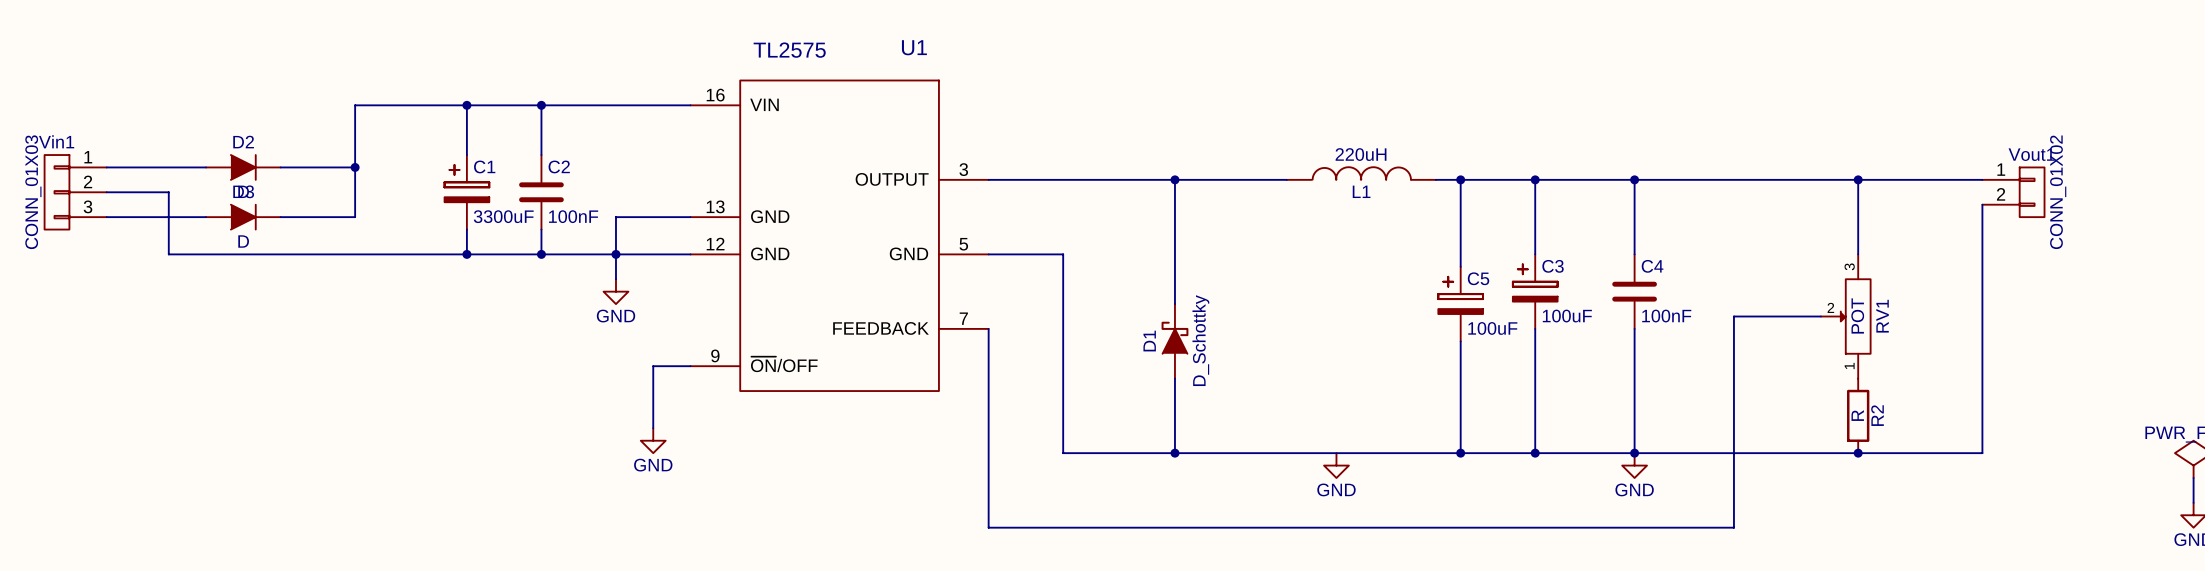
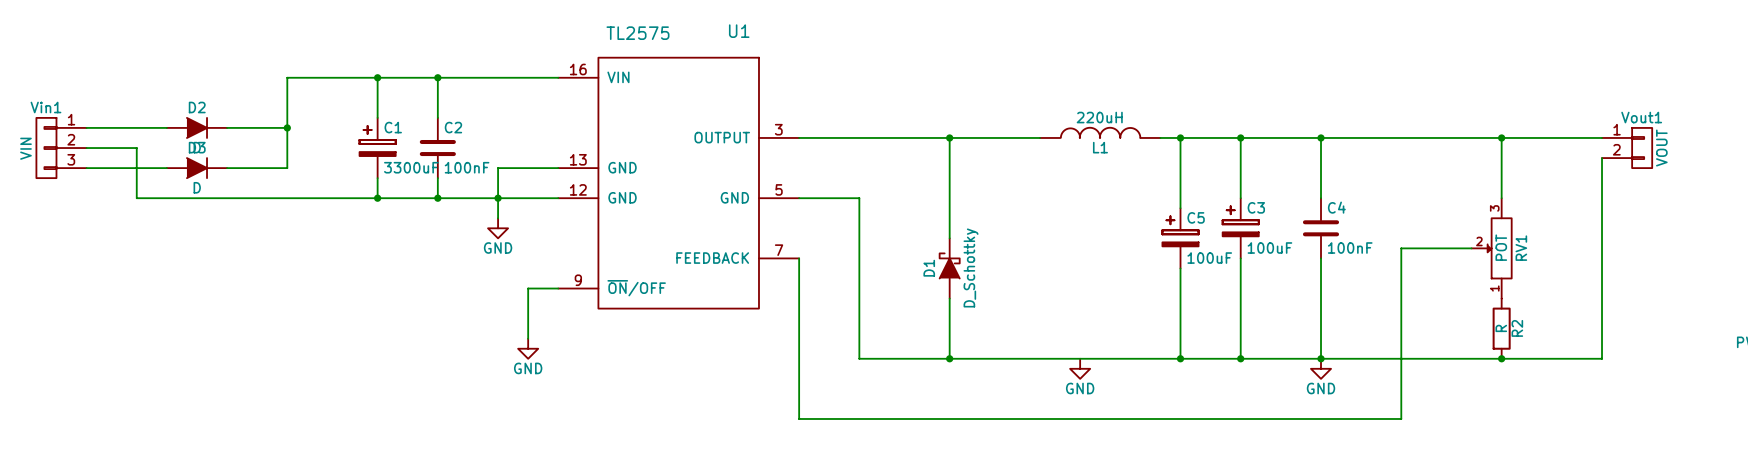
Vin1 value: CONN_01X03 (33, 192) -> VIN (25, 148)
Vout1 value: CONN_01X02 (2058, 192) -> VOUT (1661, 148)

